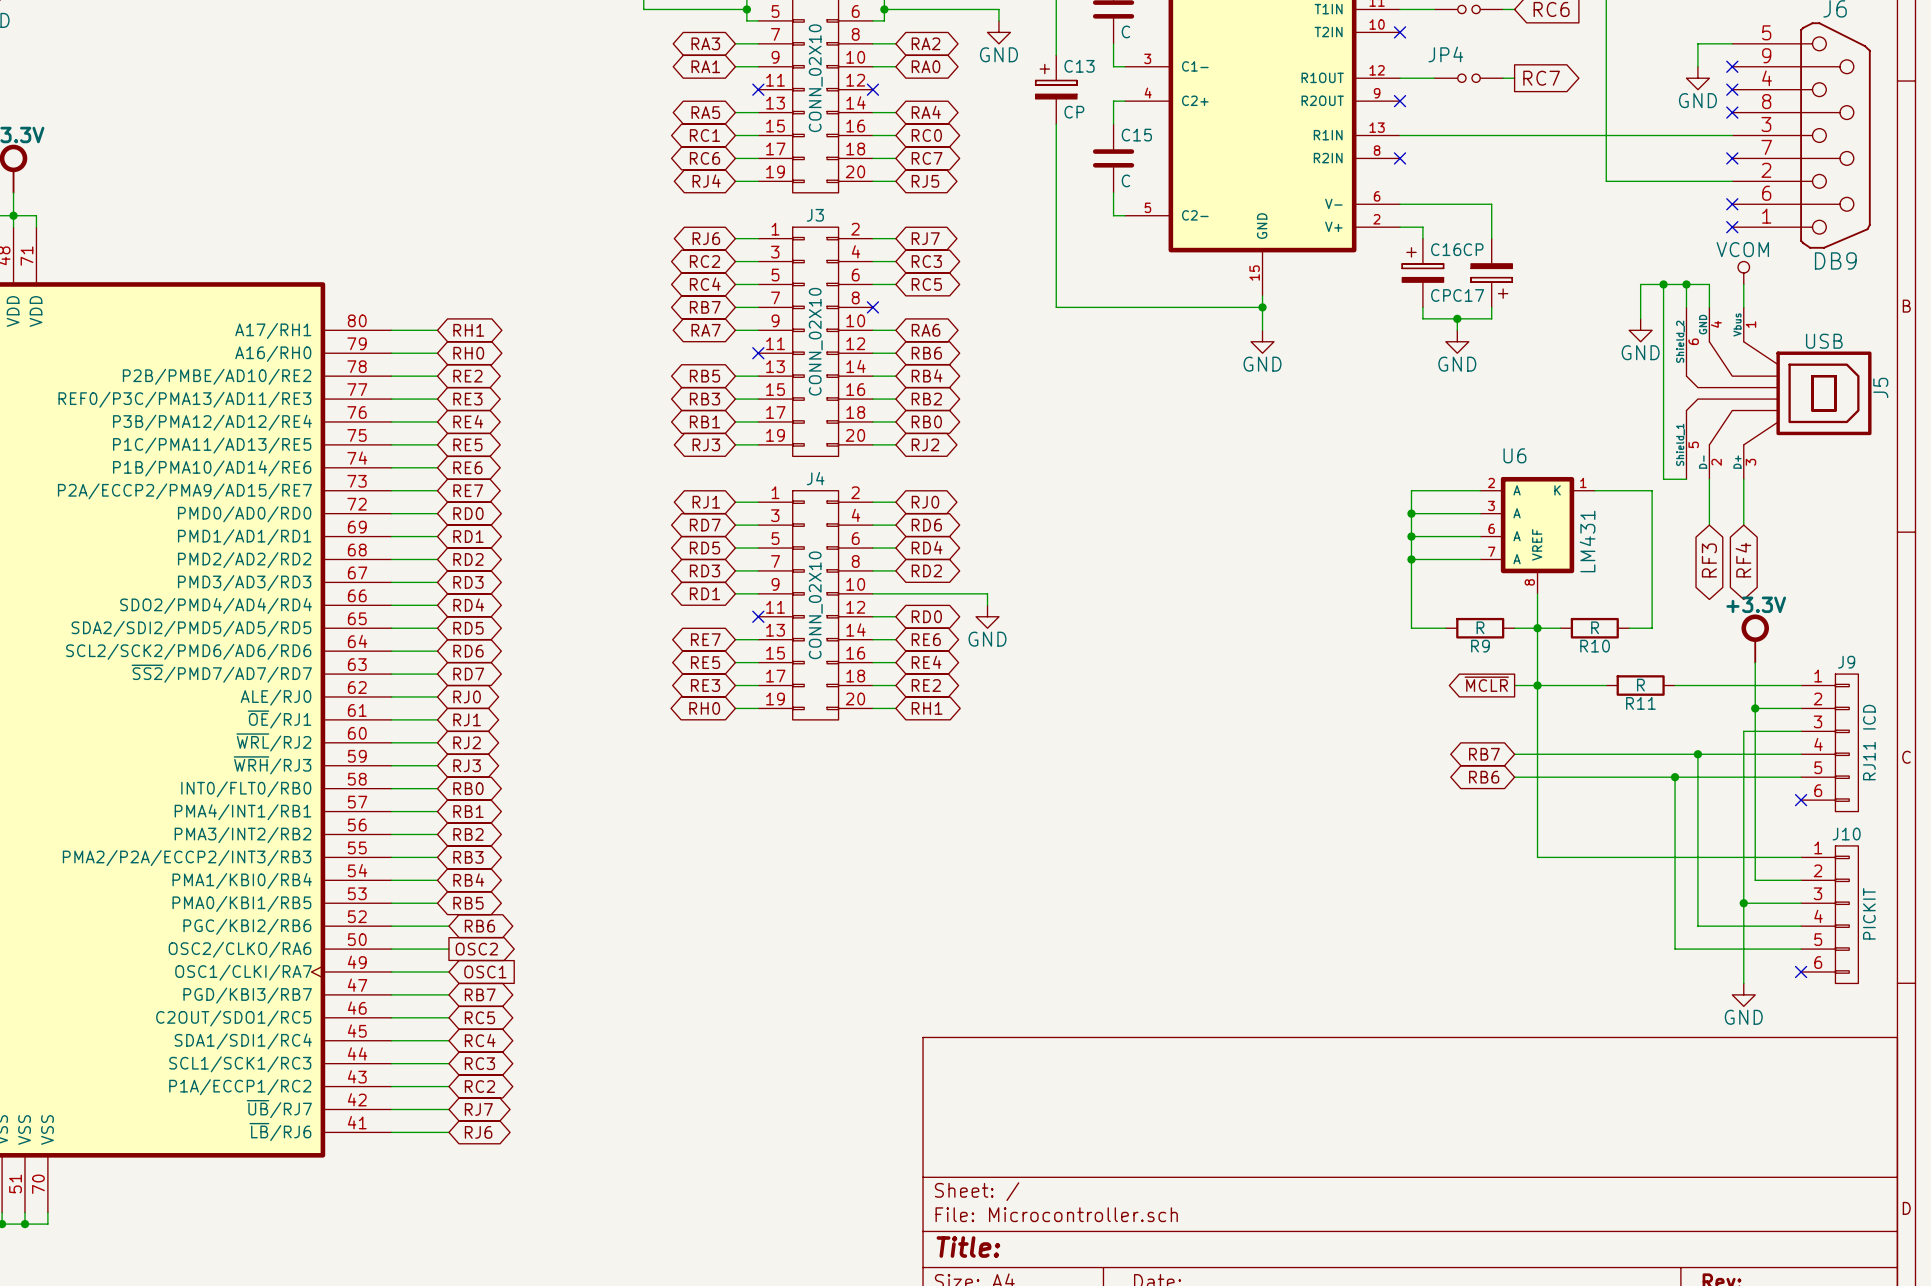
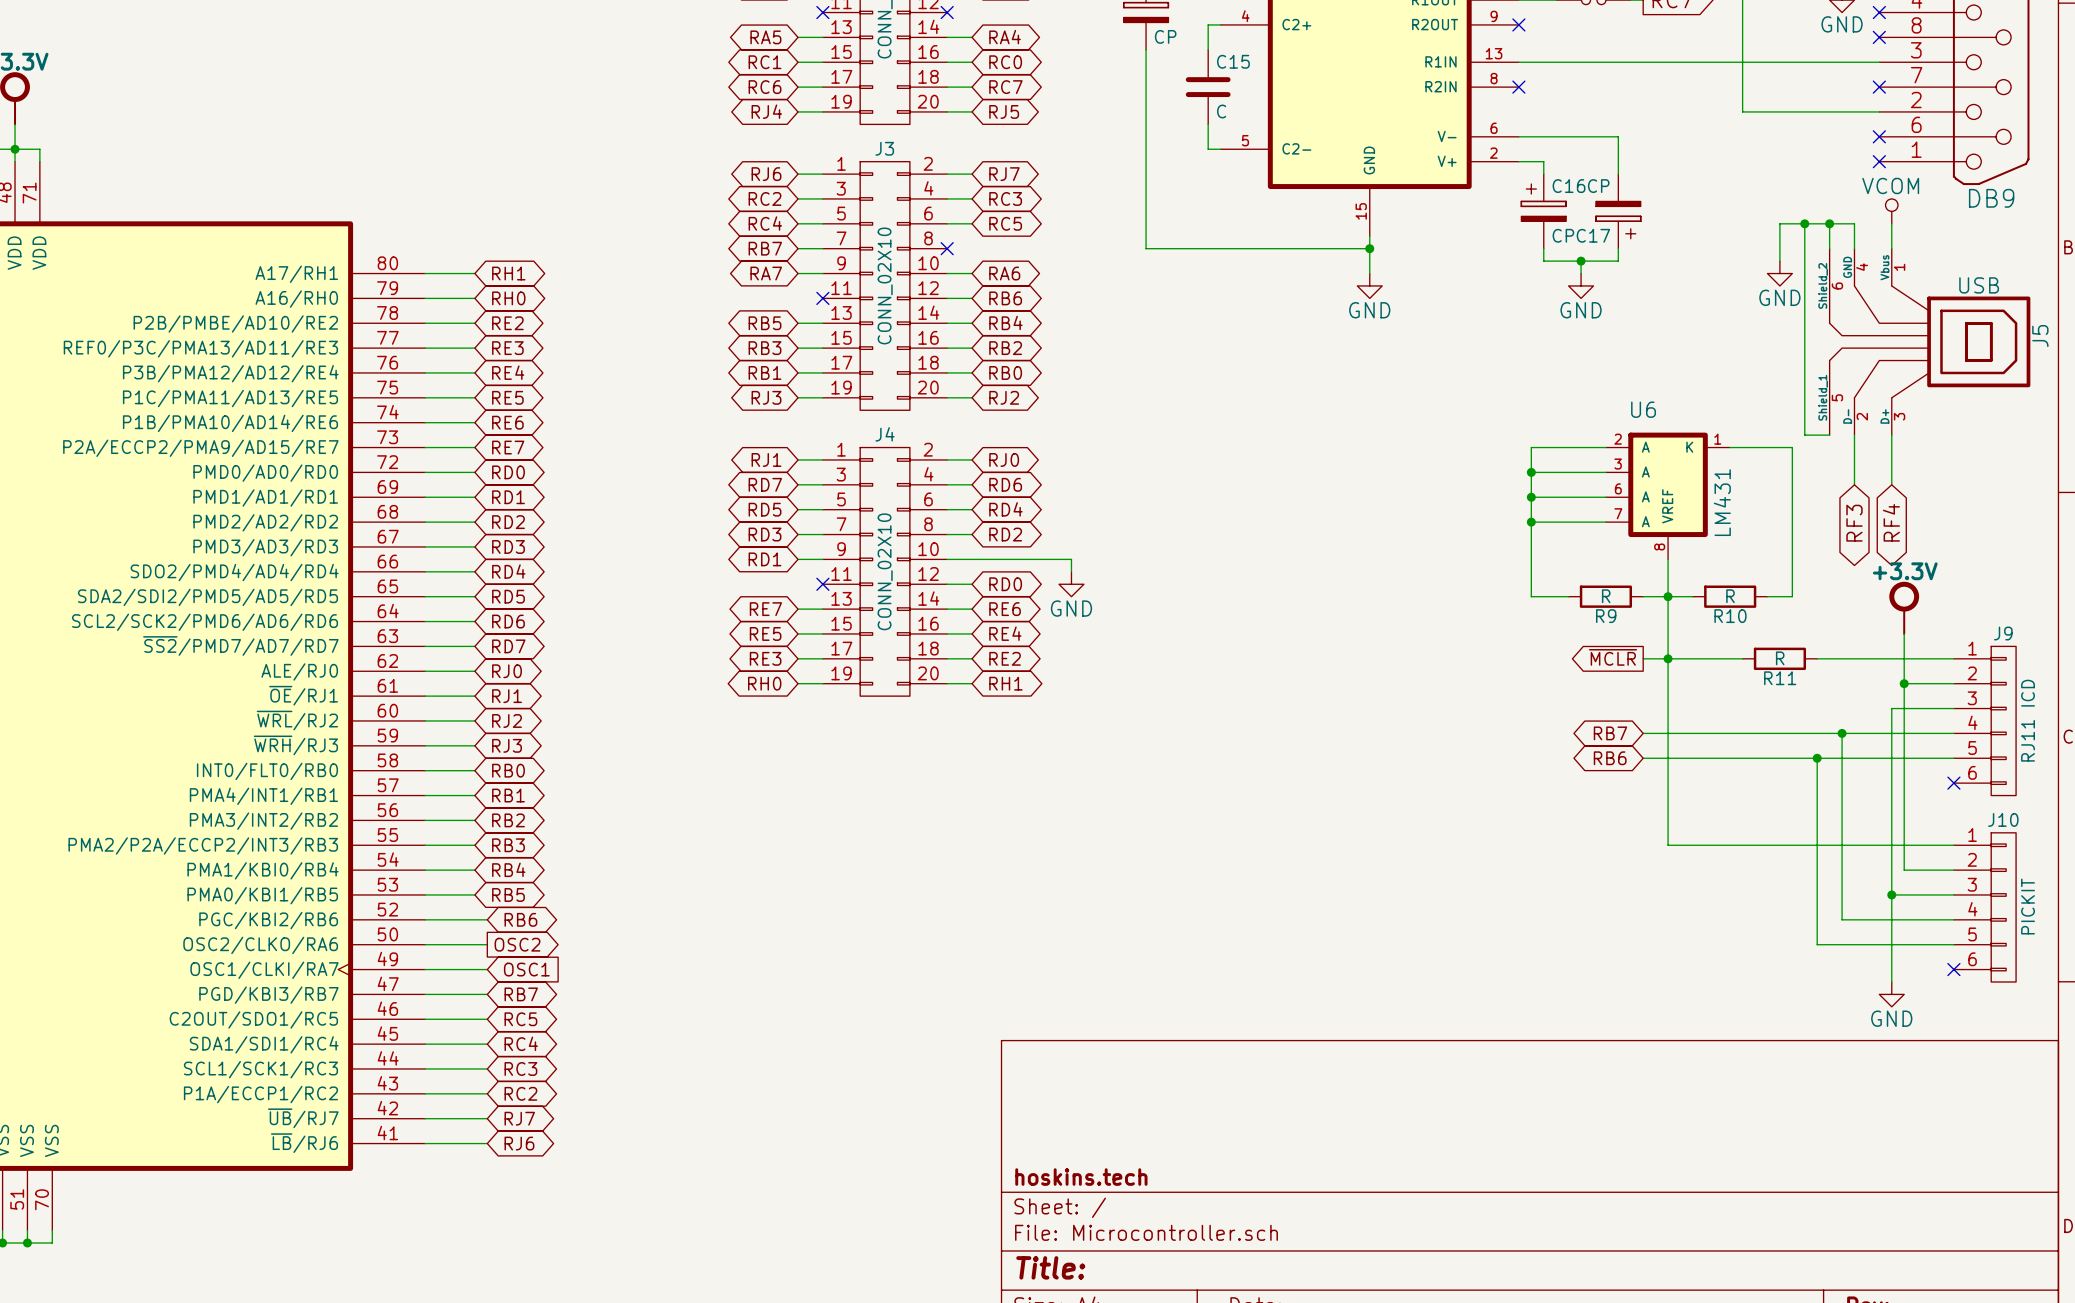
title block: none -> hoskins.tech (1081, 1177)

